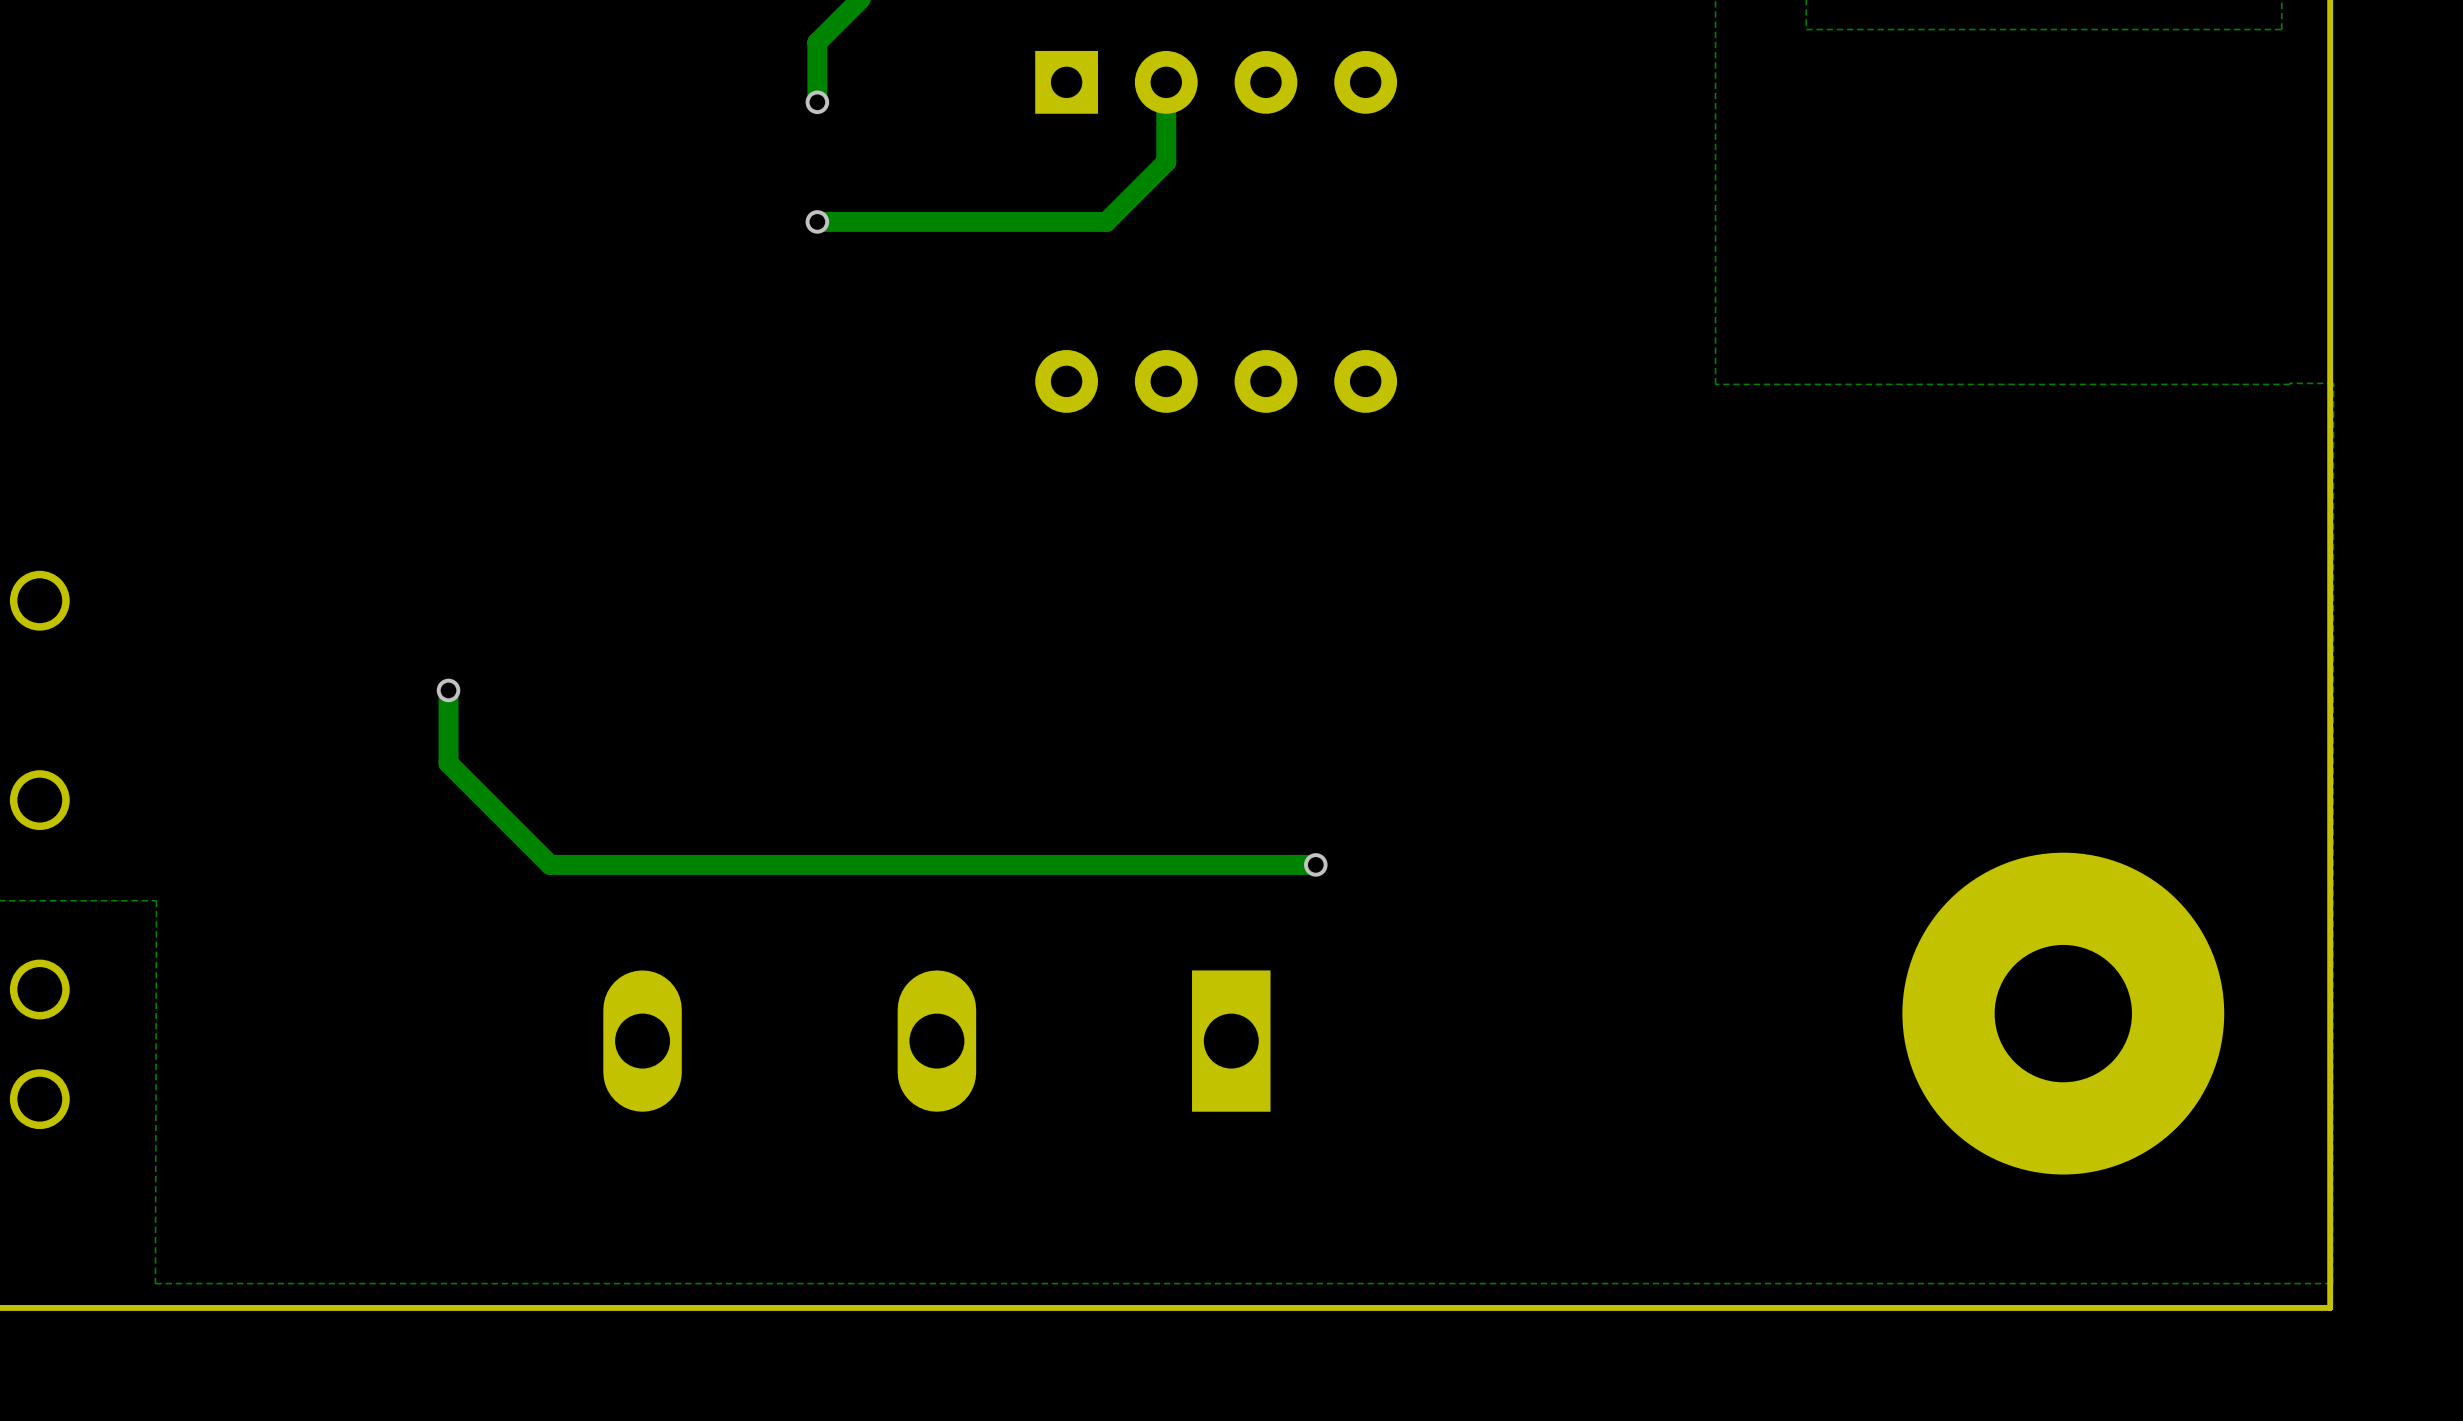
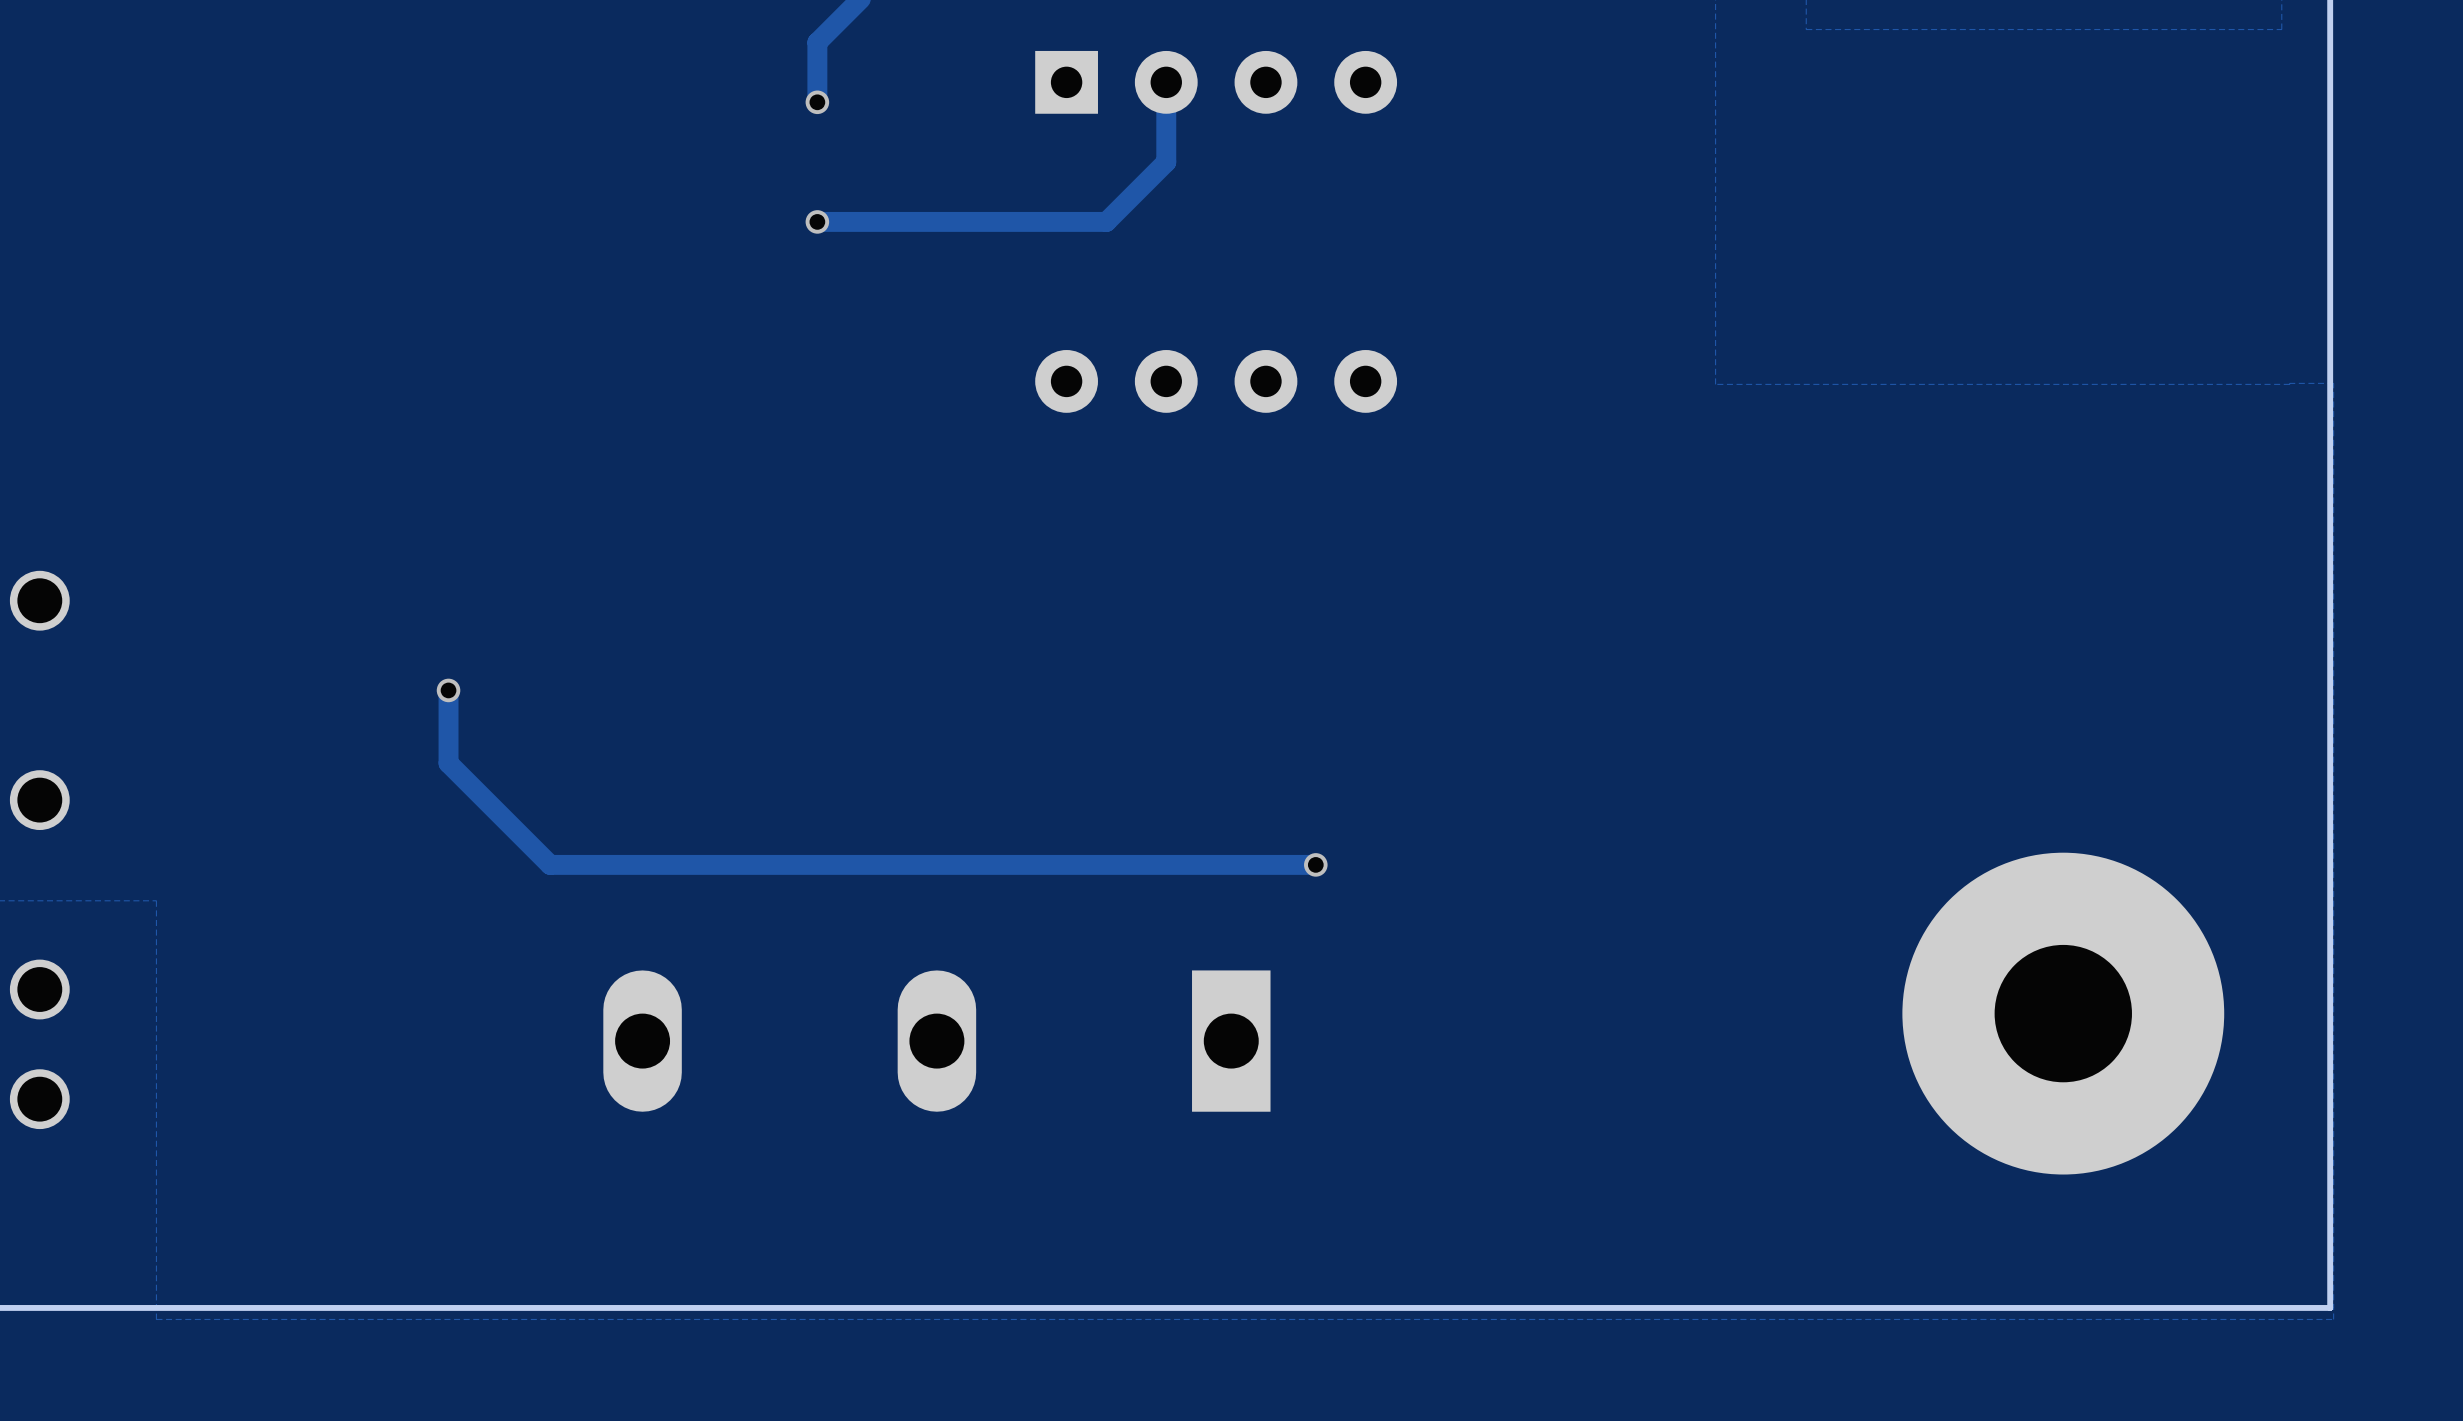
zone outline: (2333, 383) (2332, 1283) (155, 1283) (156, 900) -> (2333, 383) (2333, 1319) (156, 1319) (156, 900)

